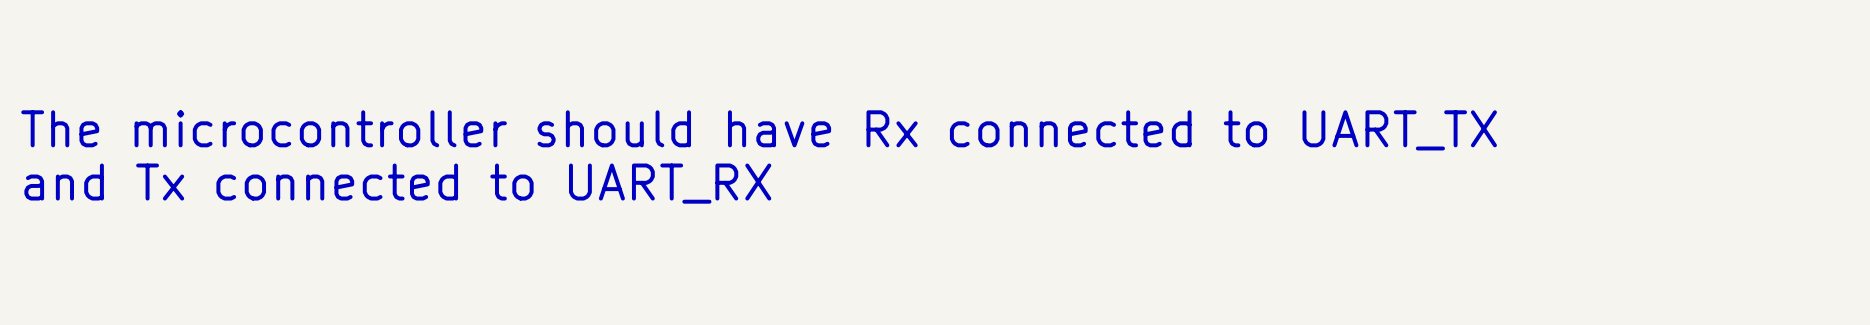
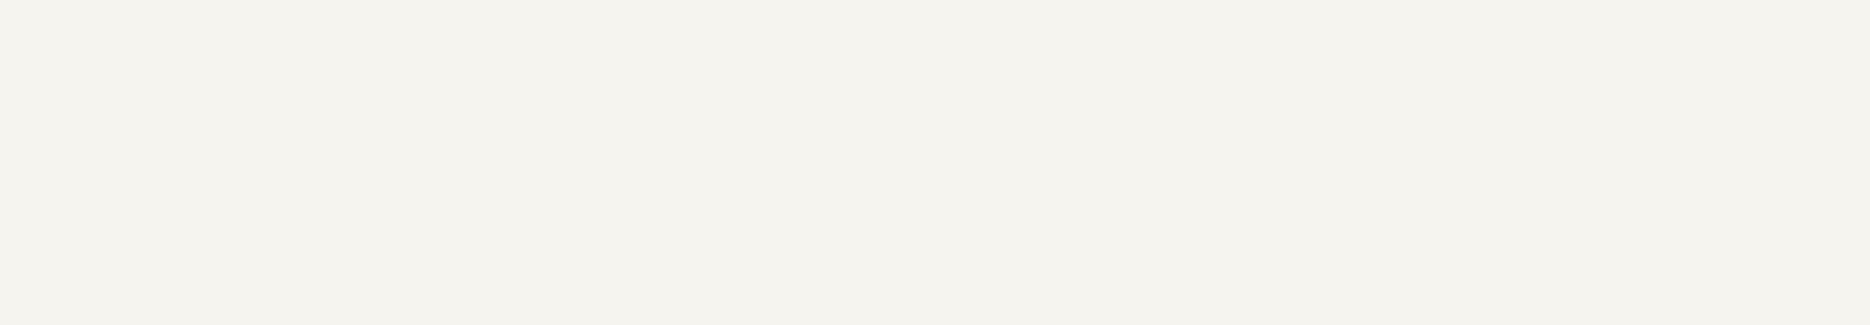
text: The microcontroller should have Rx connected to UART_TX (759, 130) -> none
text: and Tx connected to UART_RX (397, 183) -> none

